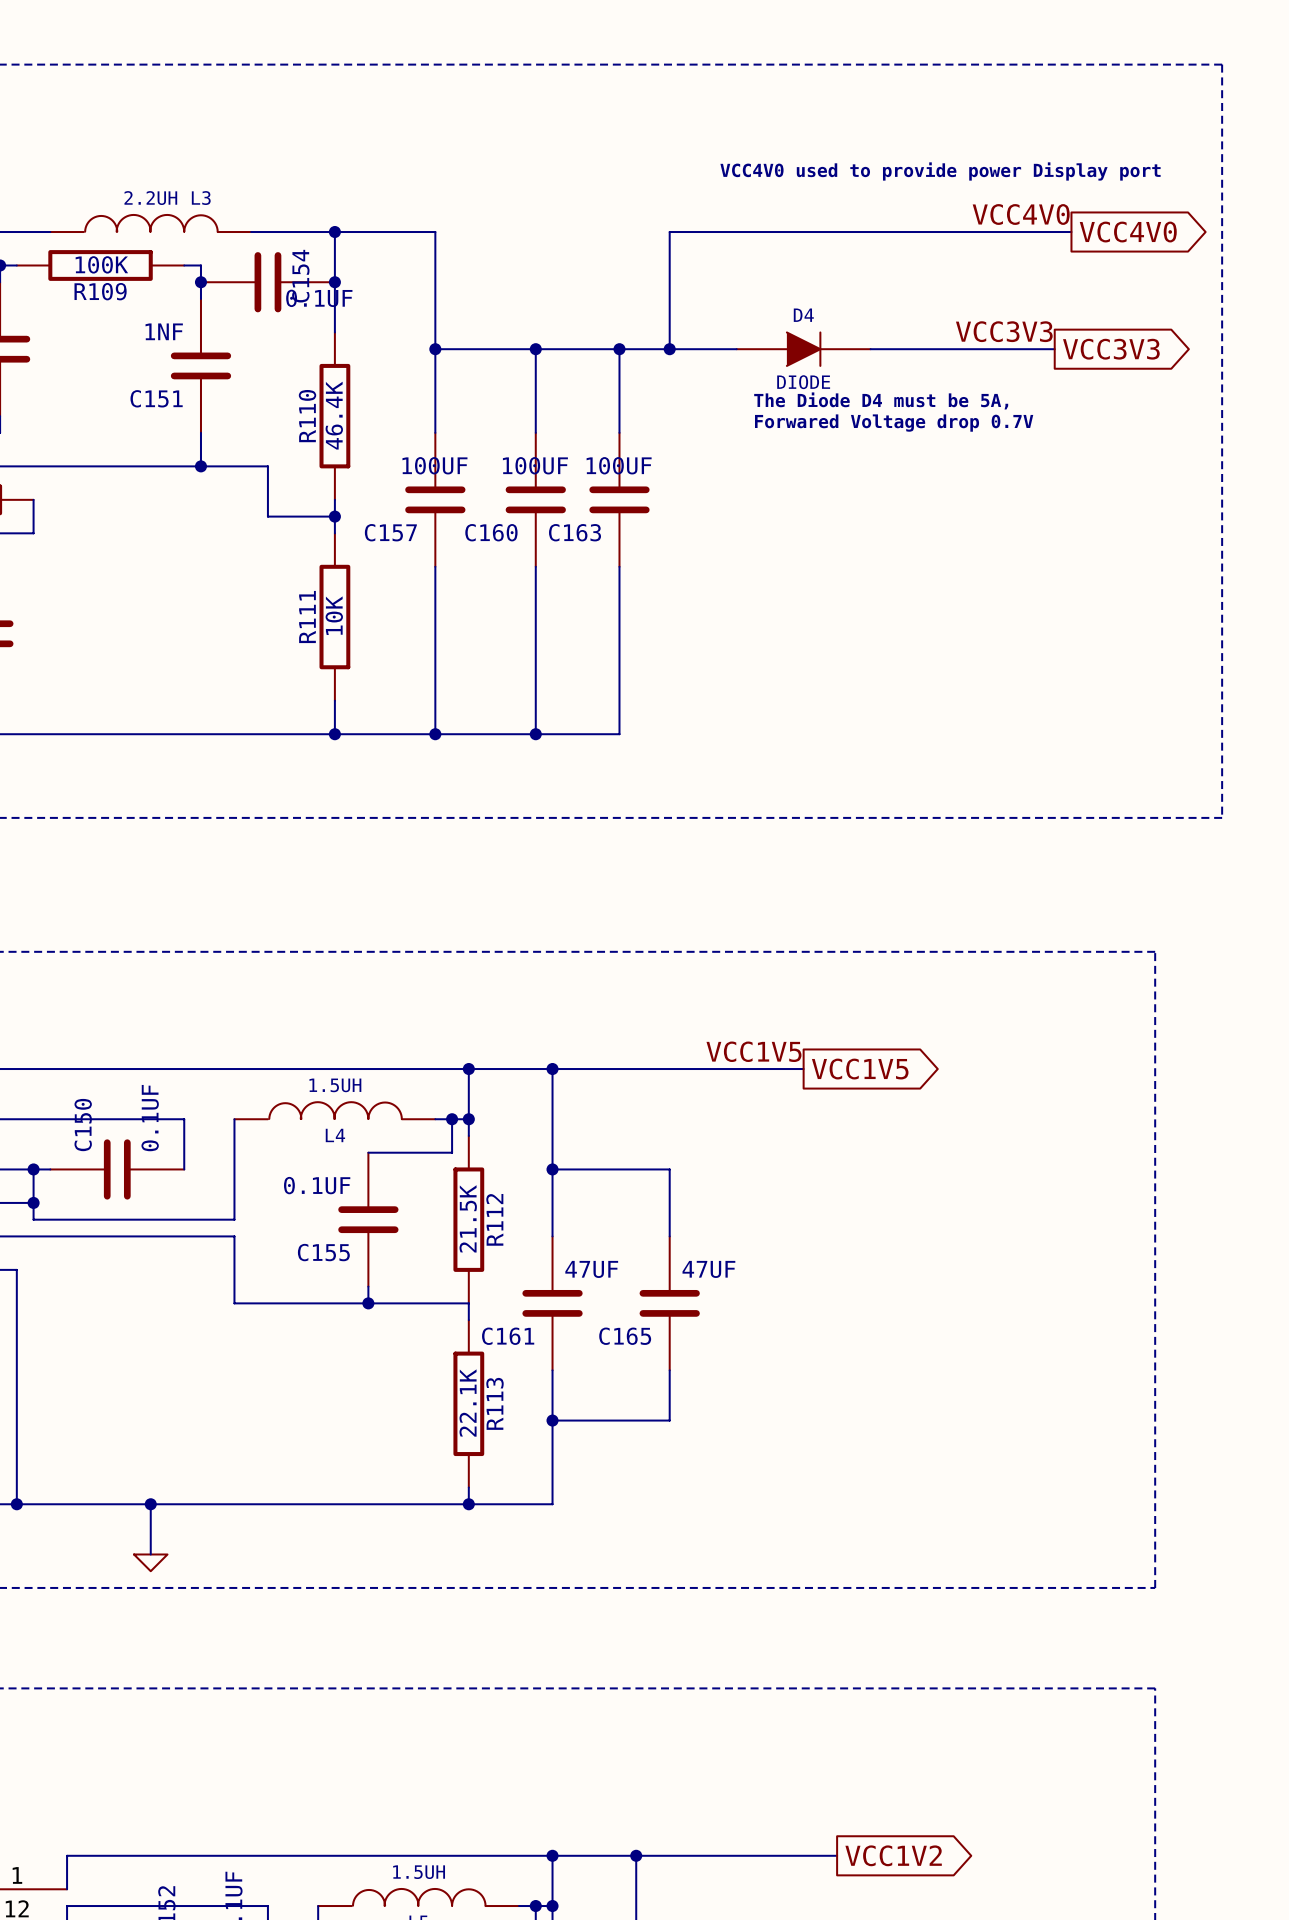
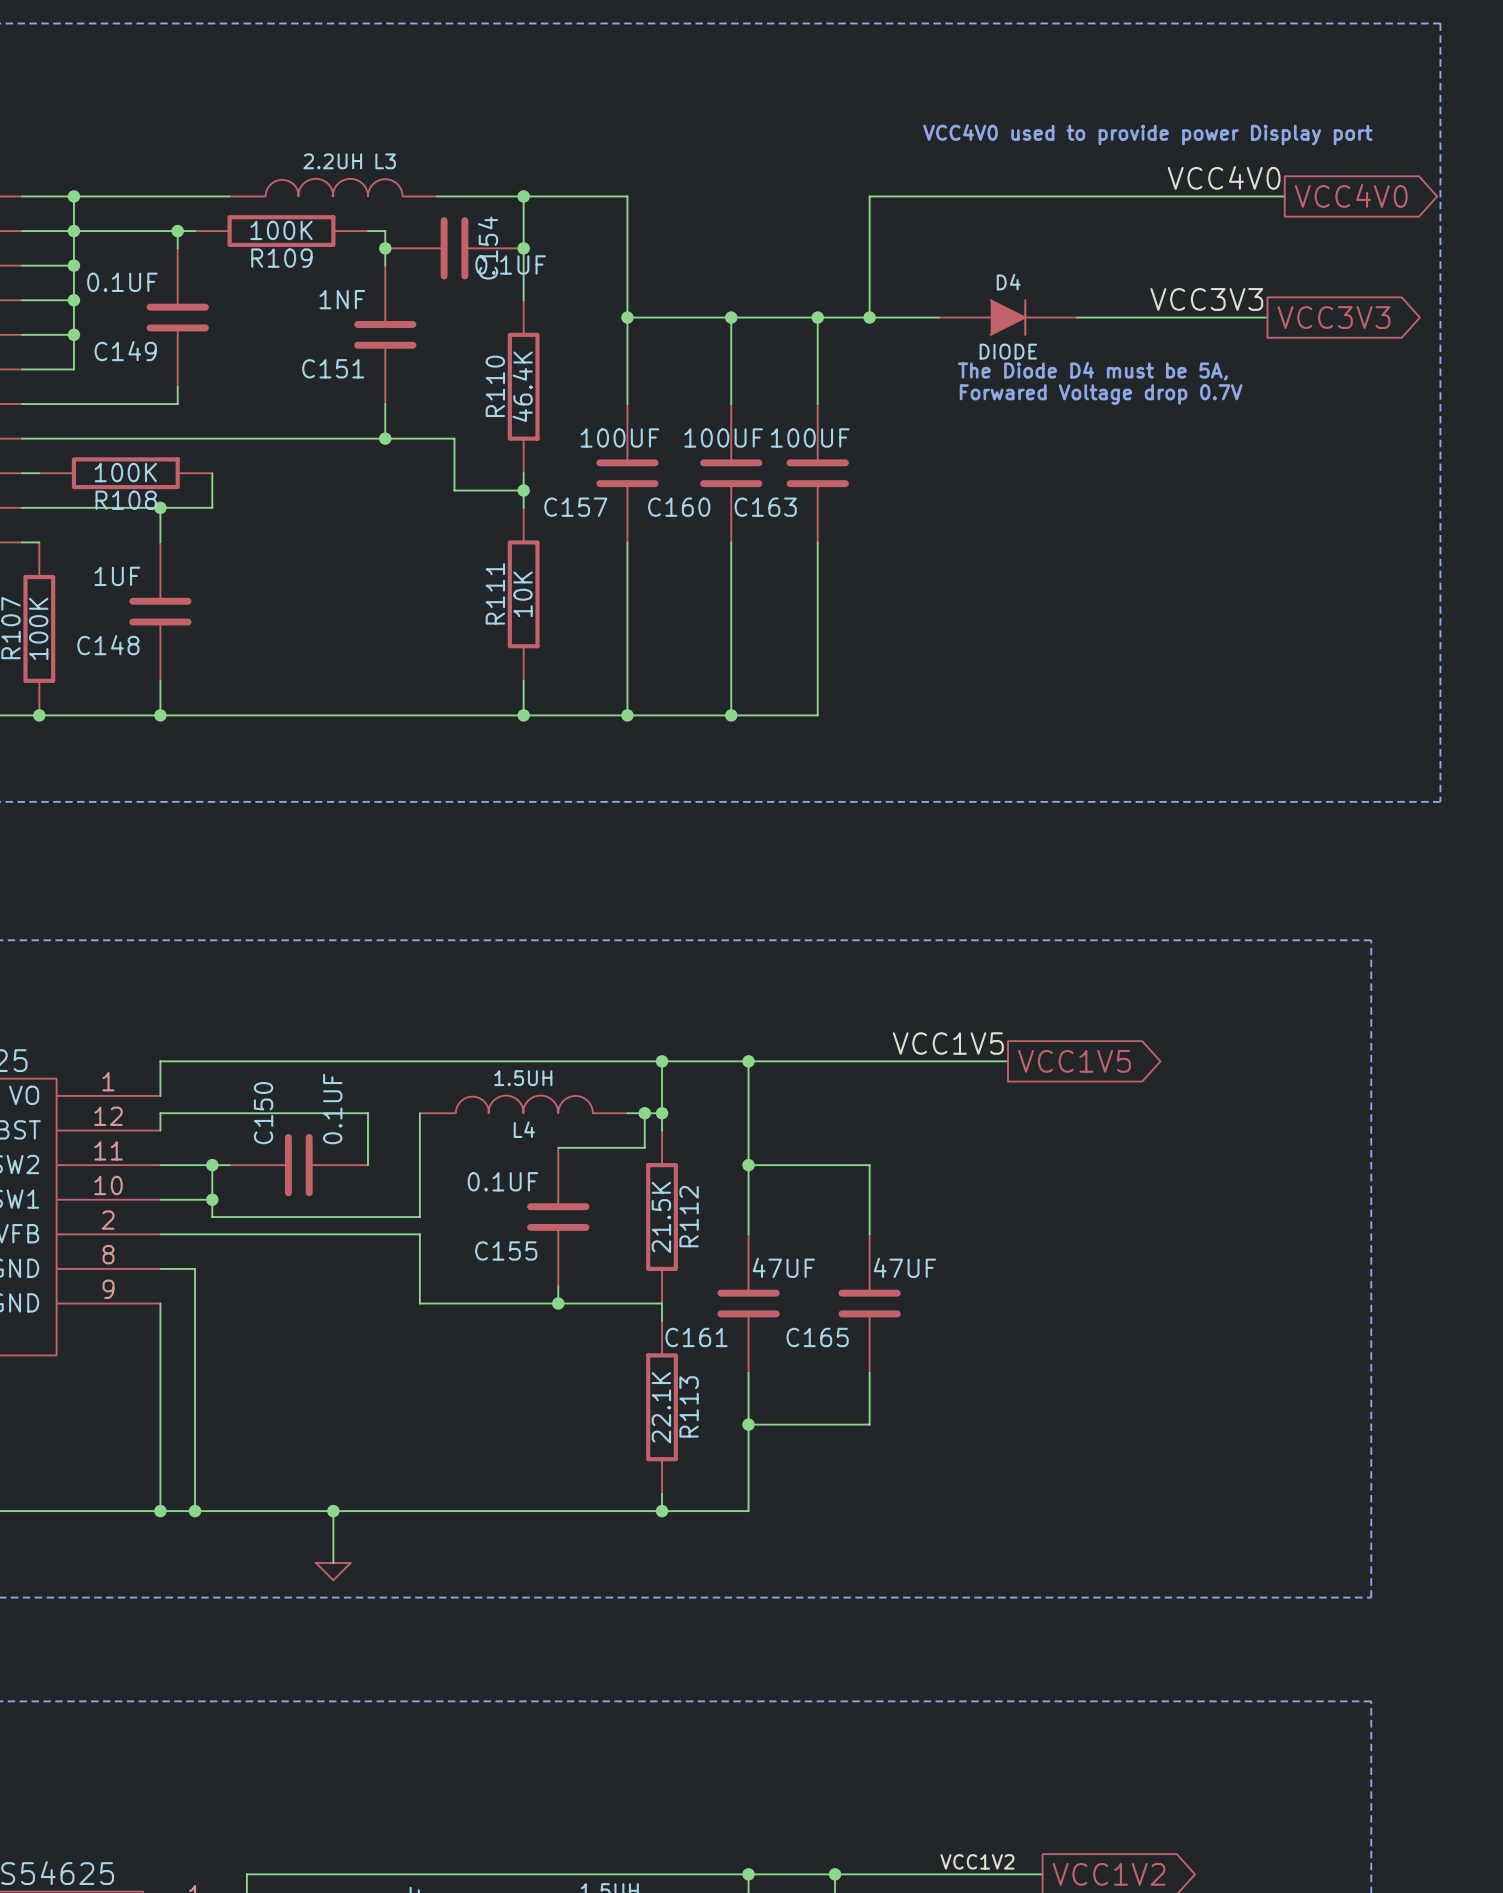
label: none -> VCC1V2 (977, 1861)

